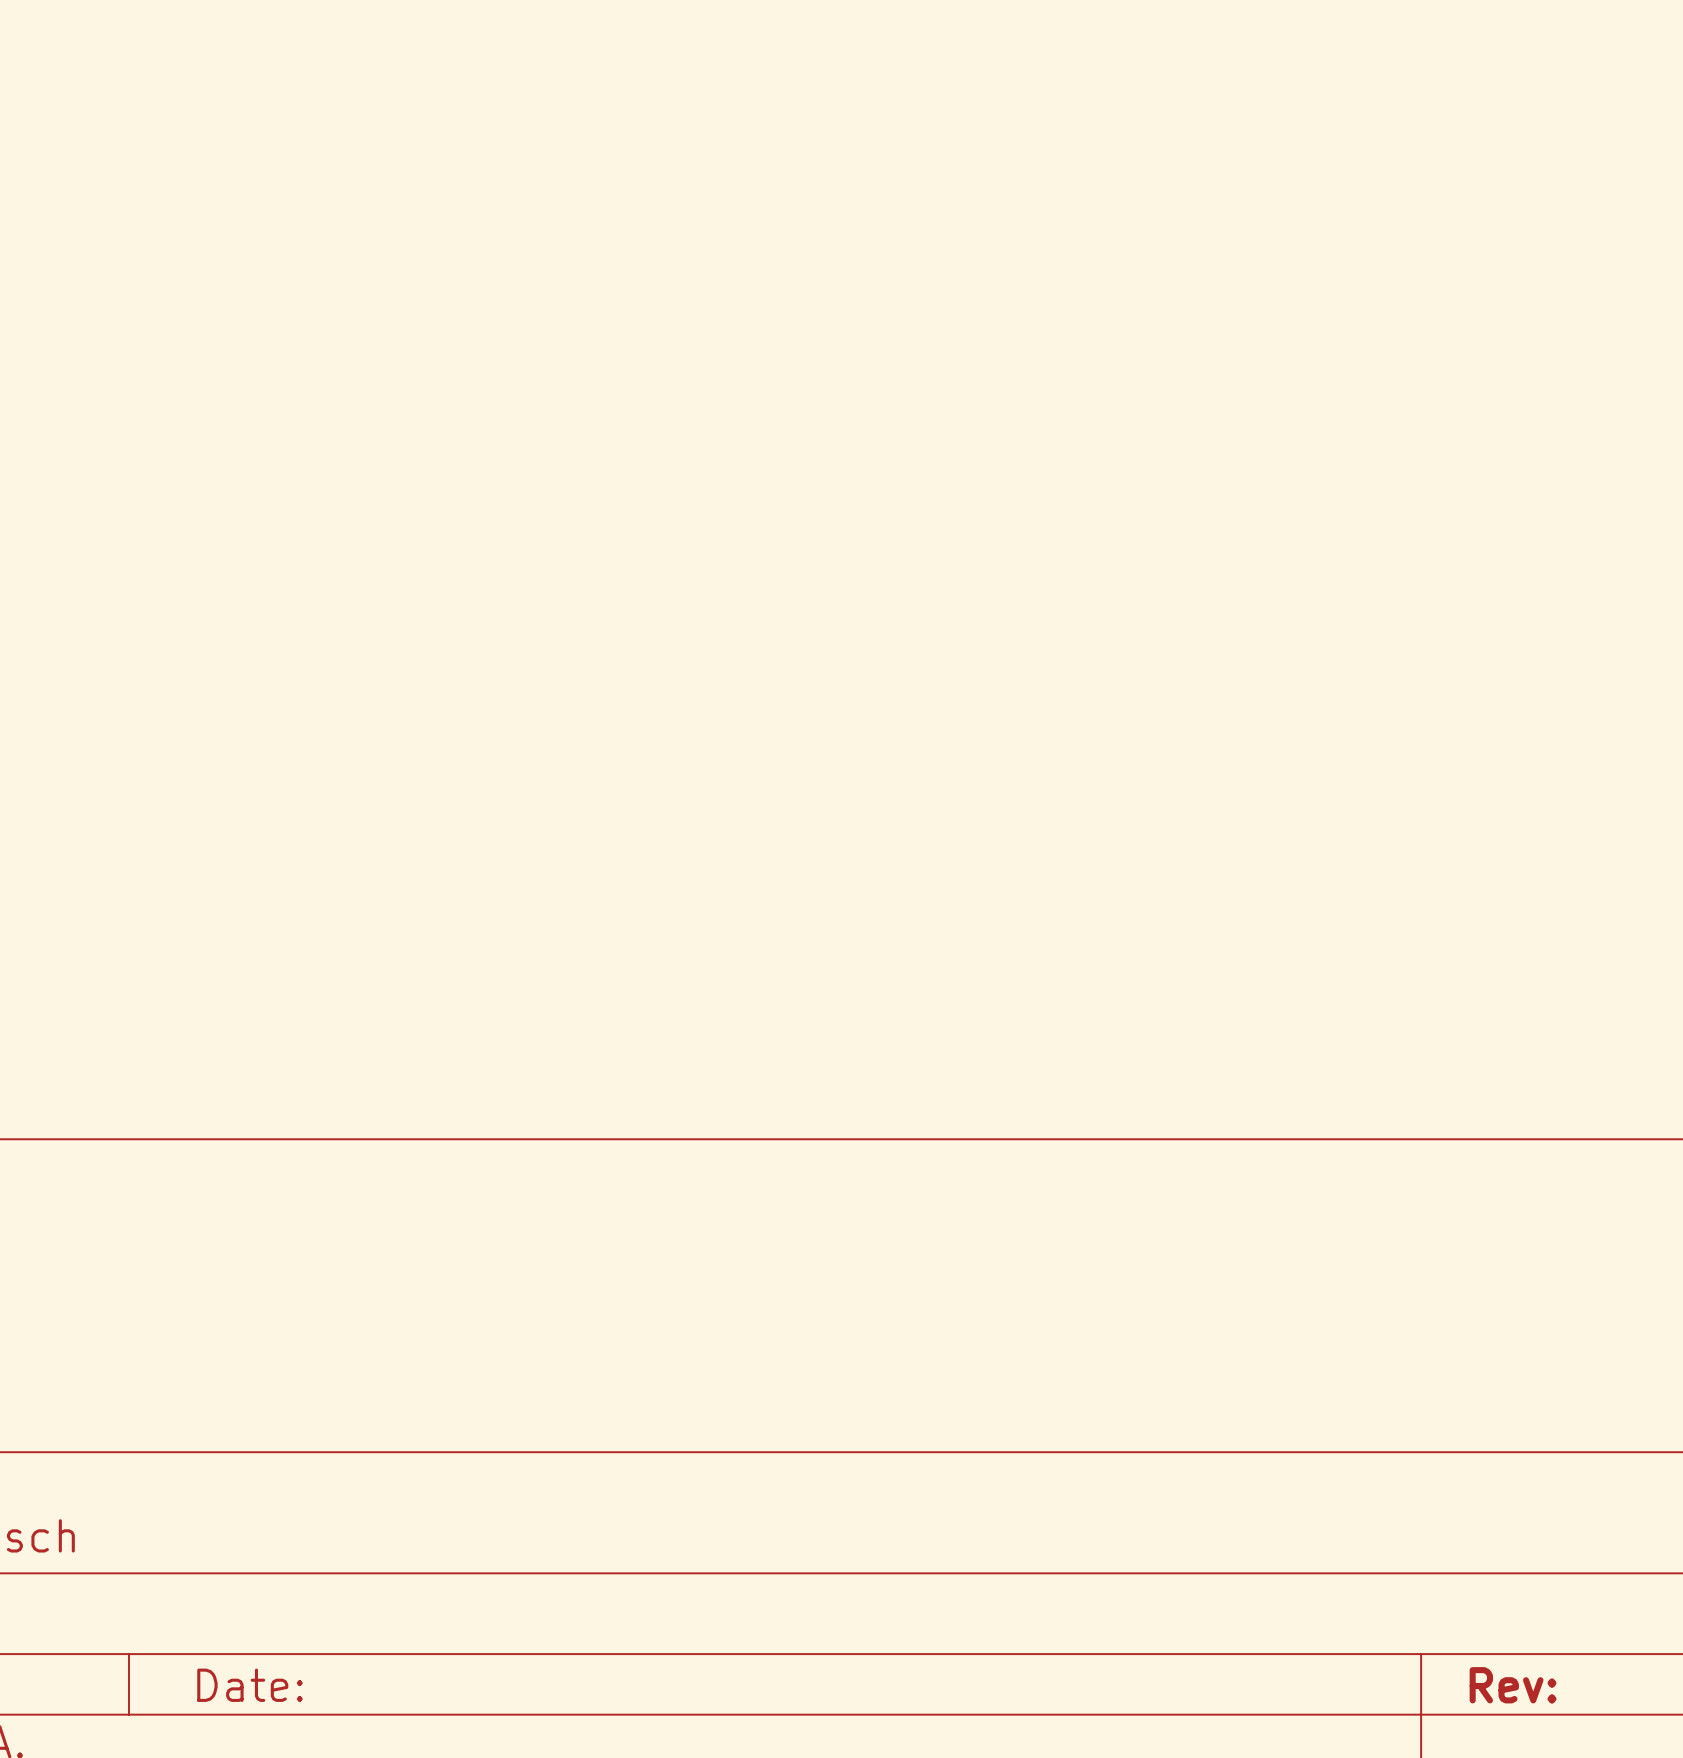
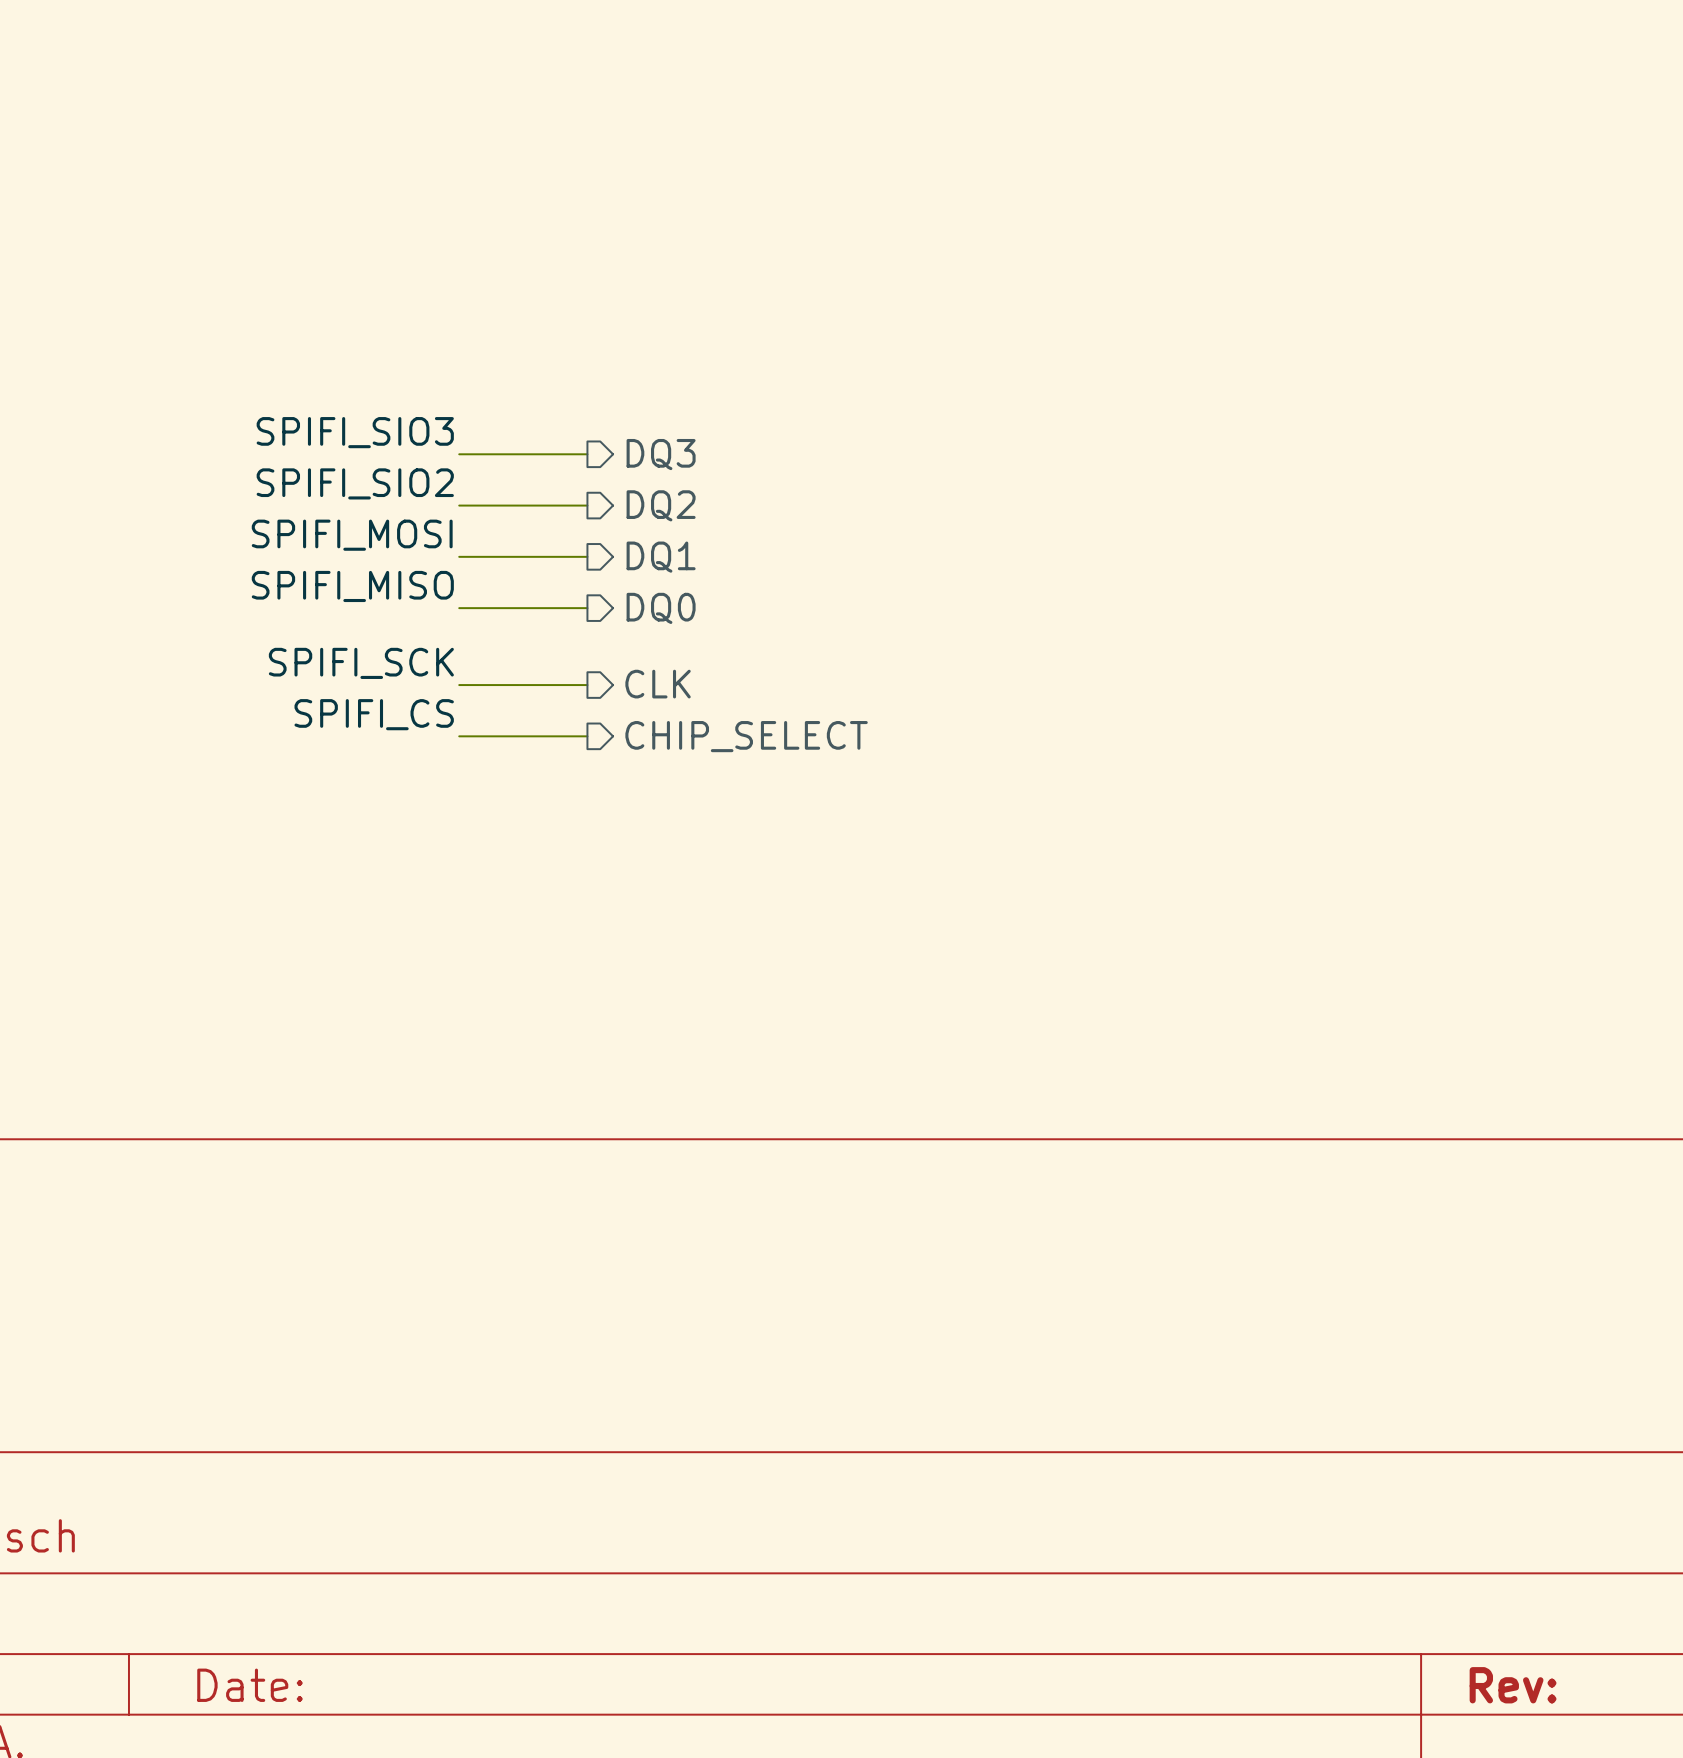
label: none -> SPIFI_SIO3 (355, 432)
wire: none -> (459, 454) (587, 454)
sheet pin: none -> DQ3 (661, 454)
label: none -> SPIFI_SIO2 (355, 483)
wire: none -> (459, 505) (587, 505)
sheet pin: none -> DQ2 (661, 505)
label: none -> SPIFI_MOSI (352, 535)
wire: none -> (459, 556) (587, 556)
sheet pin: none -> DQ1 (661, 557)
label: none -> SPIFI_MISO (352, 586)
wire: none -> (459, 608) (587, 608)
sheet pin: none -> DQ0 (661, 608)
label: none -> SPIFI_SCK (361, 663)
sheet pin: none -> CLK (658, 684)
wire: none -> (459, 685) (587, 685)
label: none -> SPIFI_CS (374, 714)
wire: none -> (459, 736) (587, 736)
sheet pin: none -> CHIP_SELECT (746, 736)

